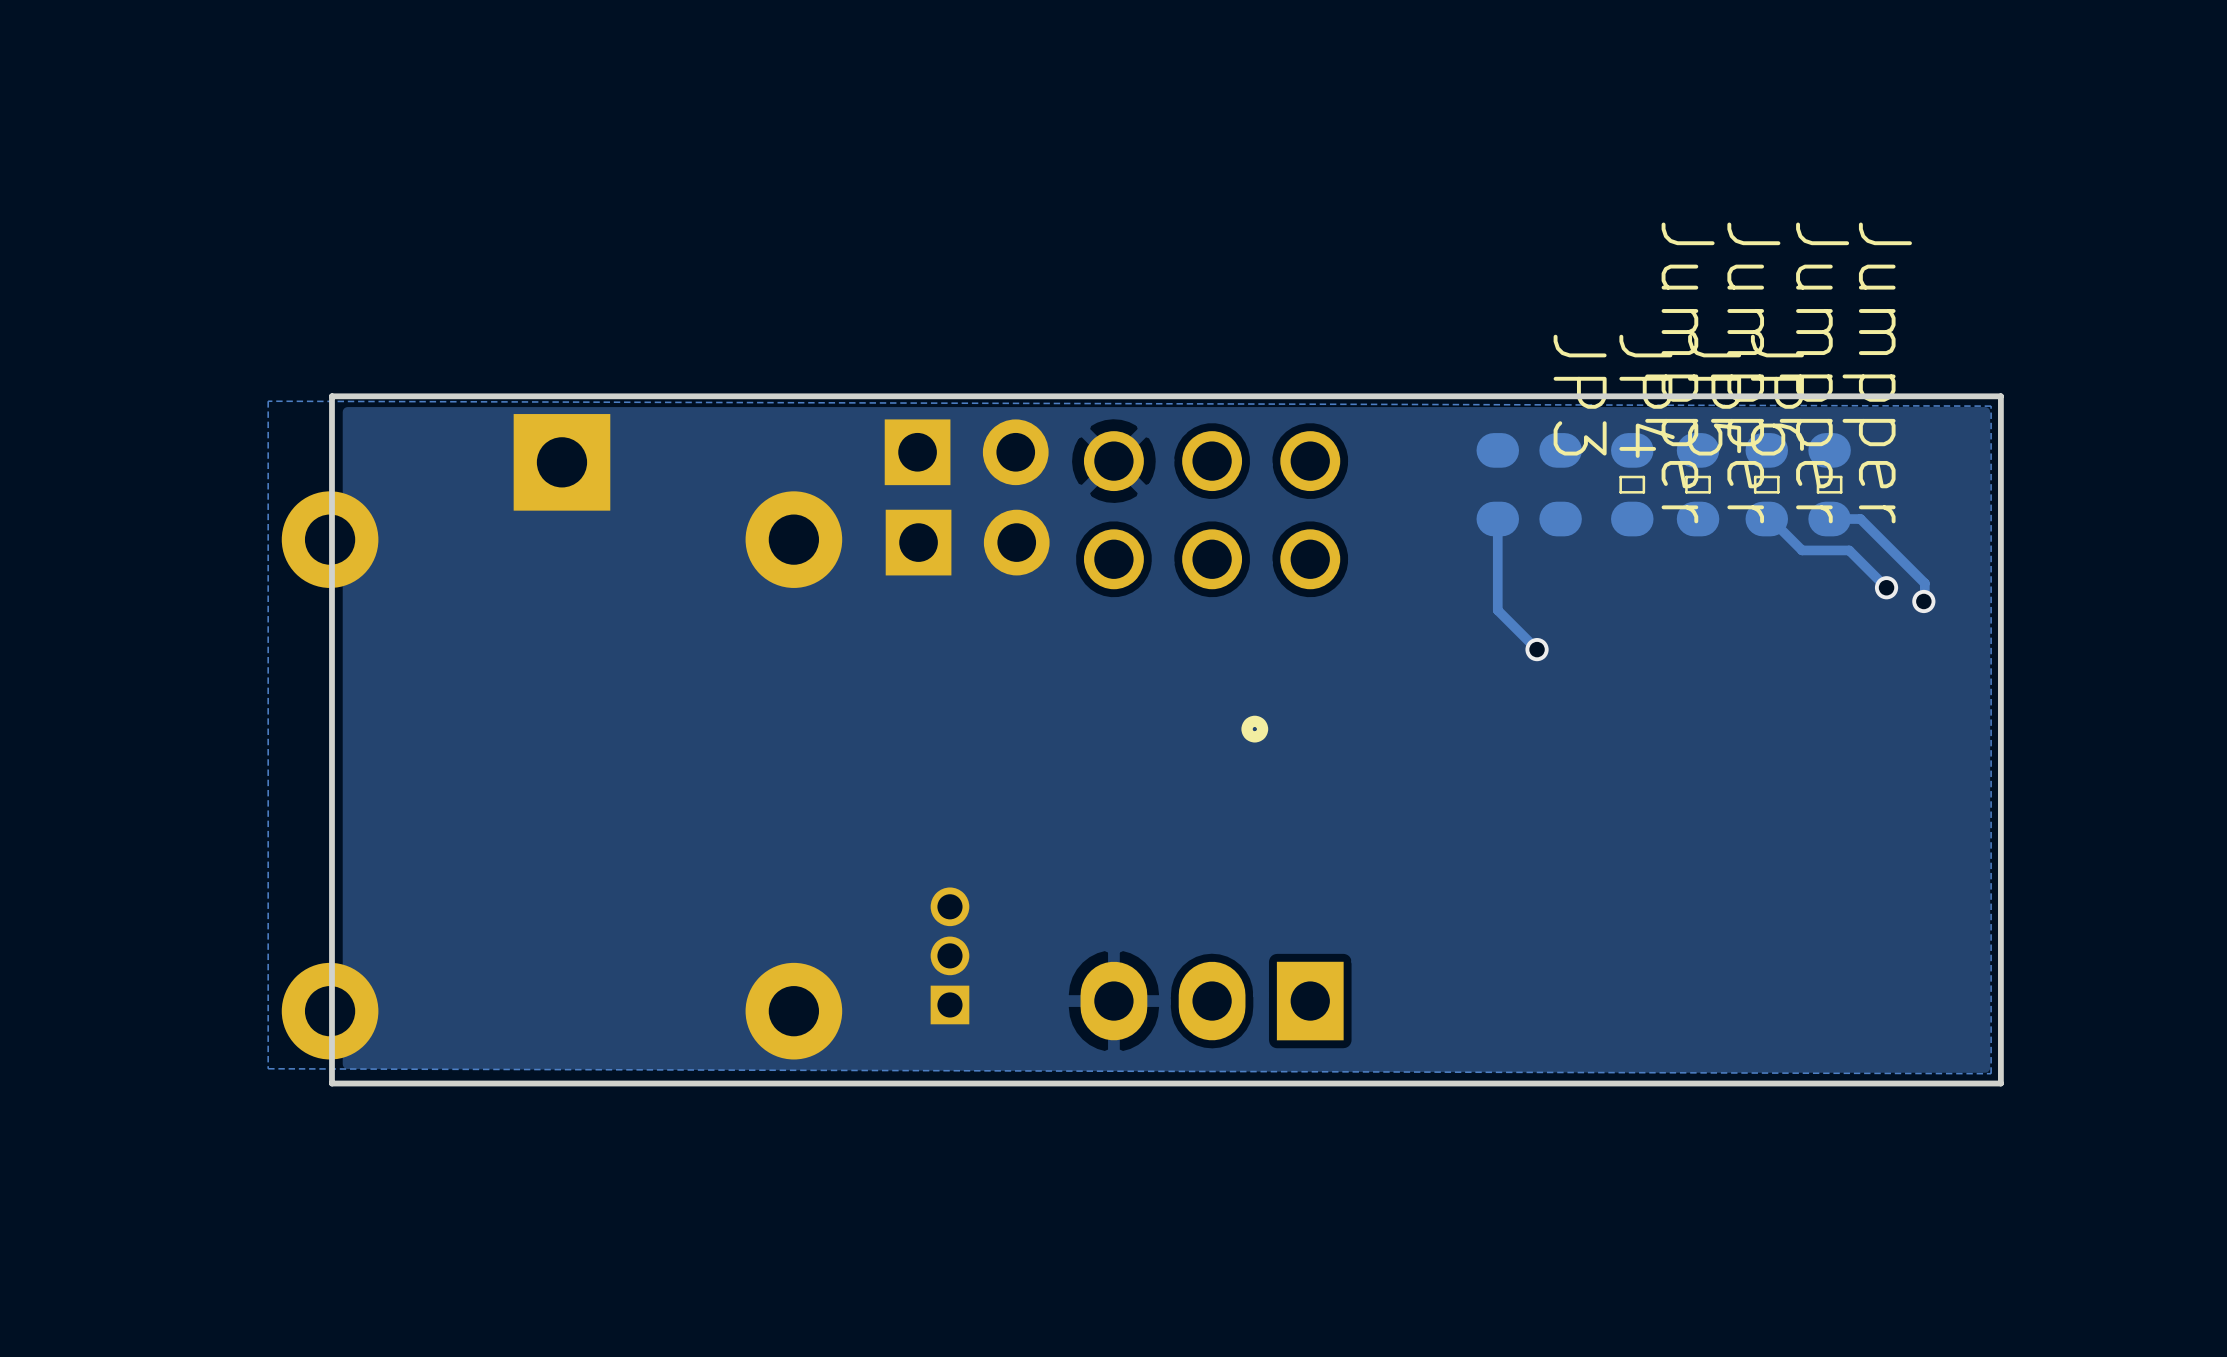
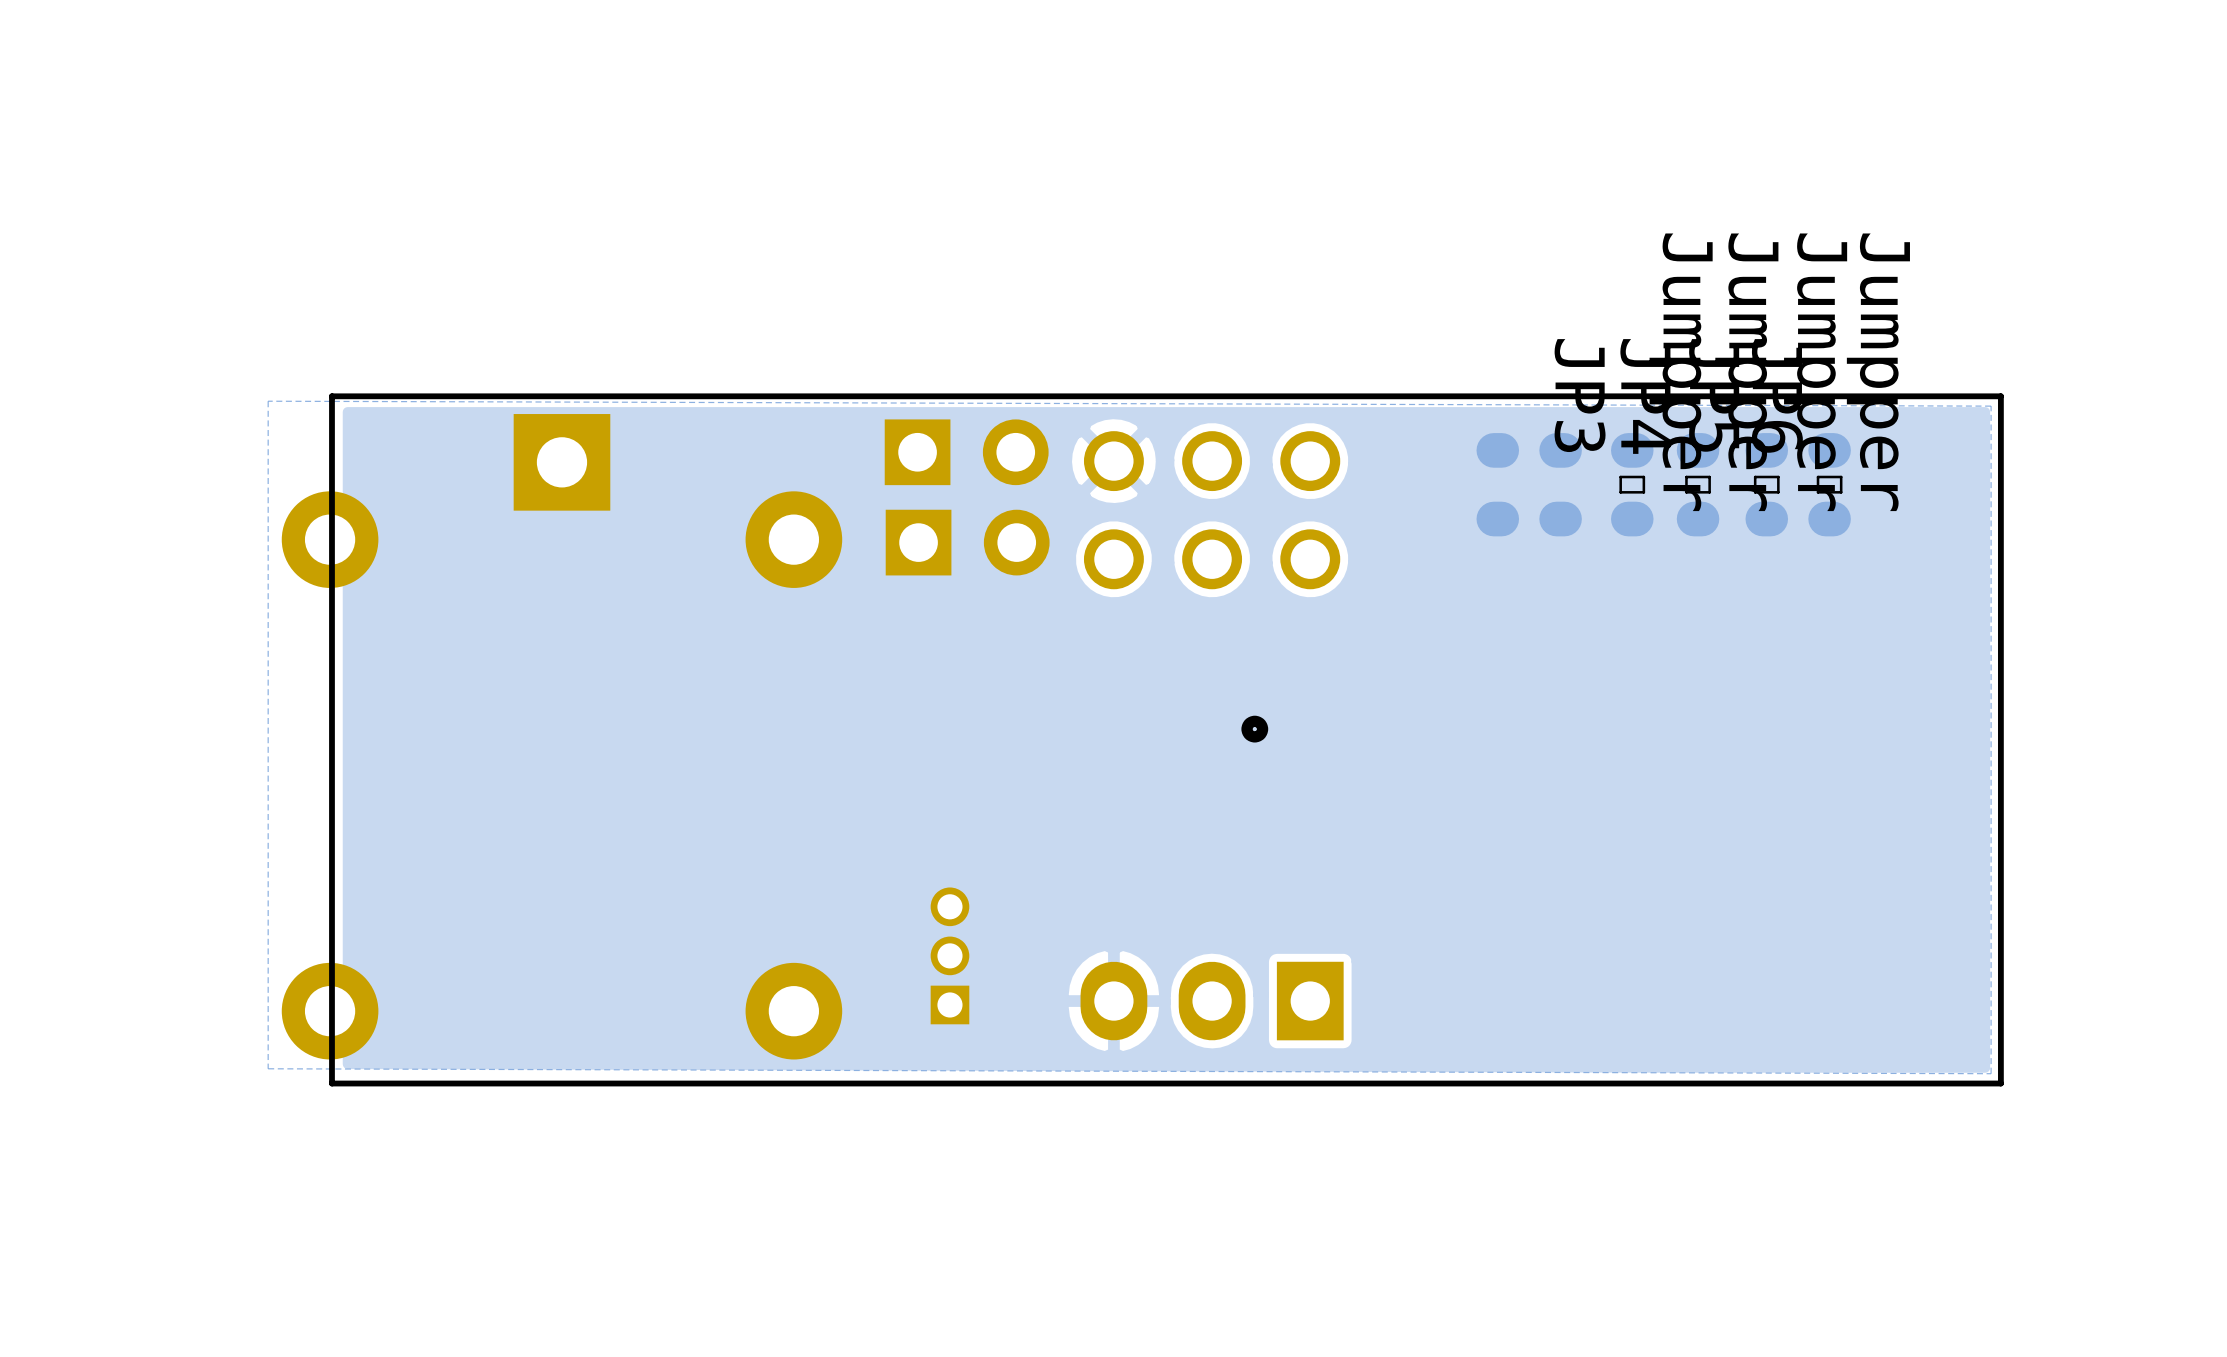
track: (1497, 519) (1497, 610) (1537, 649) -> none
track: (1766, 519) (1770, 519) (1802, 550) (1849, 550) (1886, 587) -> none
track: (1829, 519) (1860, 519) (1924, 583) (1923, 601) -> none
via: (1886, 587) -> none
via: (1923, 601) -> none
via: (1537, 649) -> none

